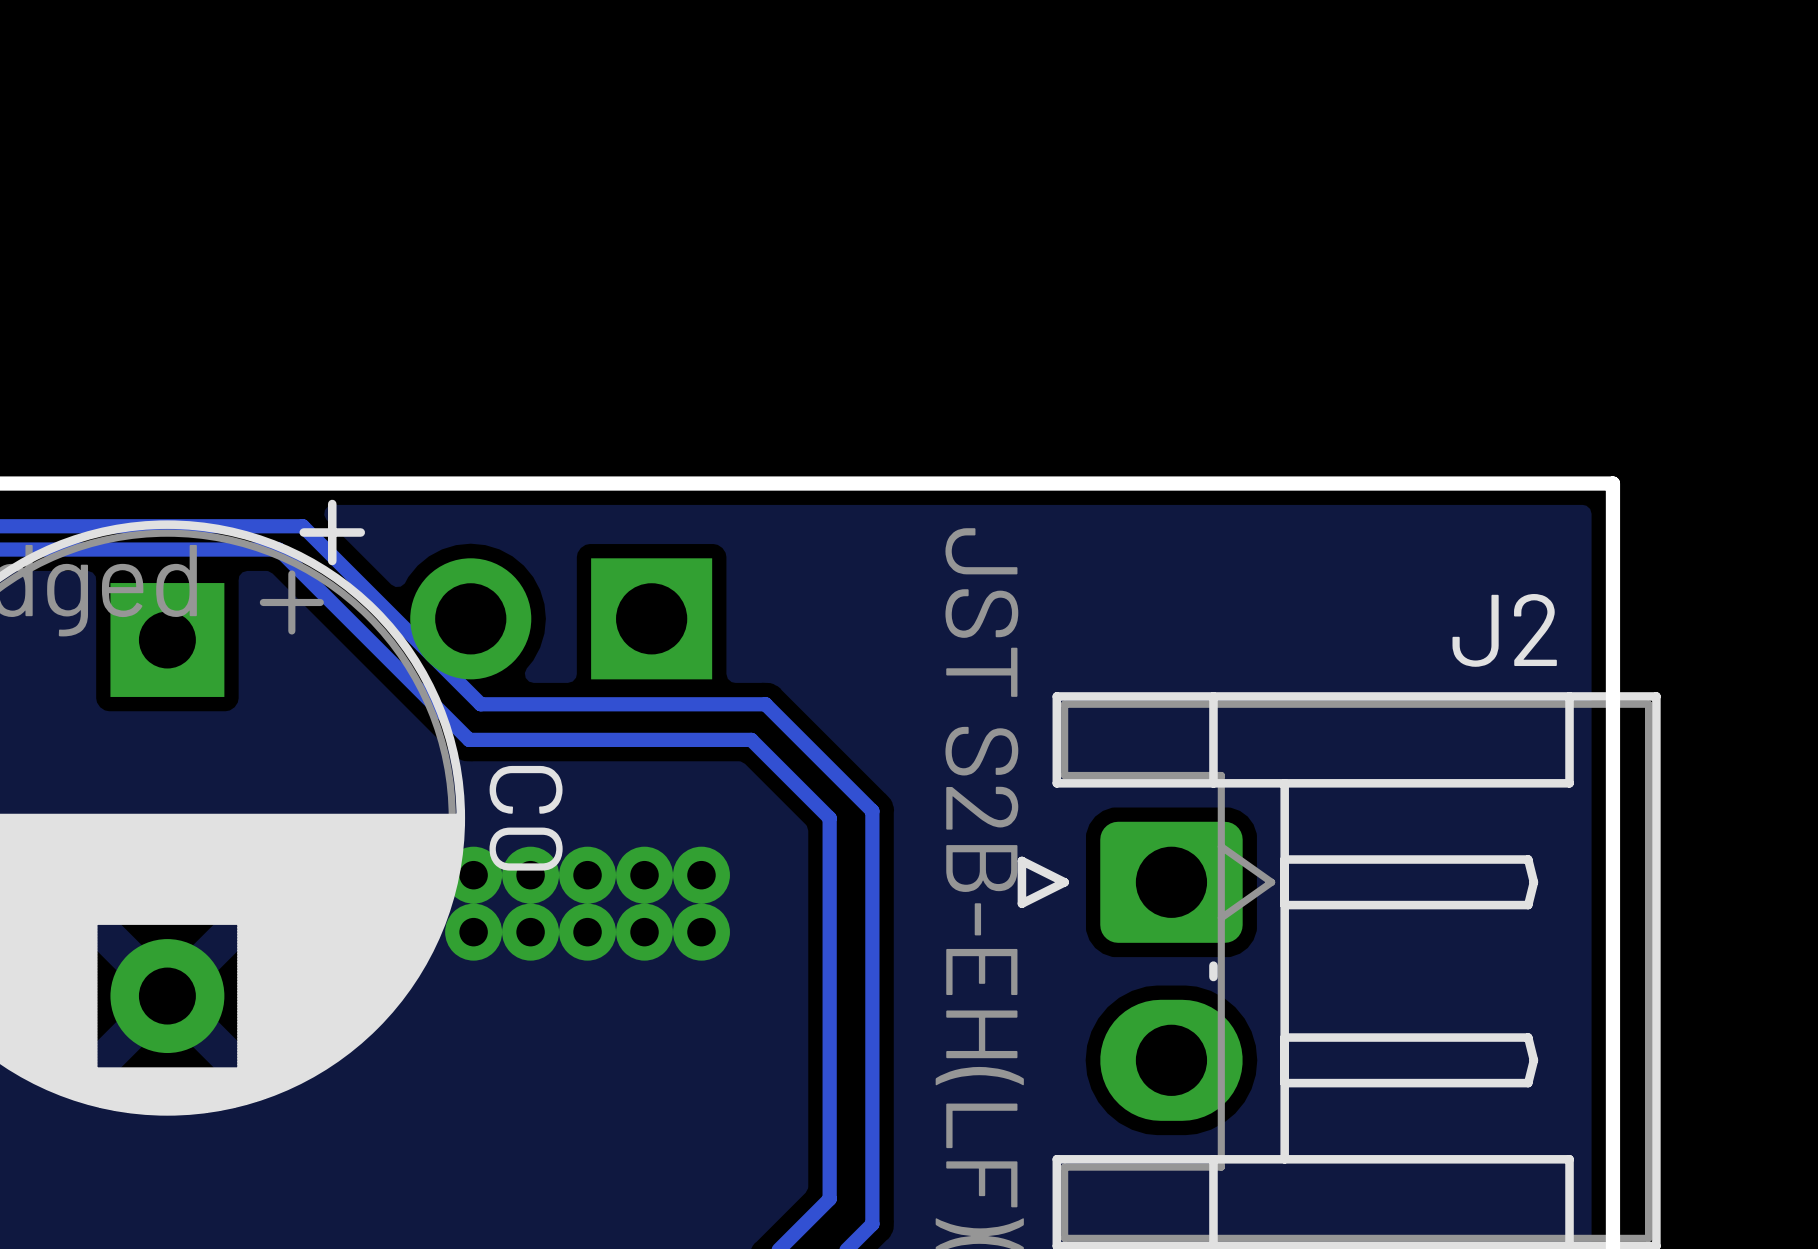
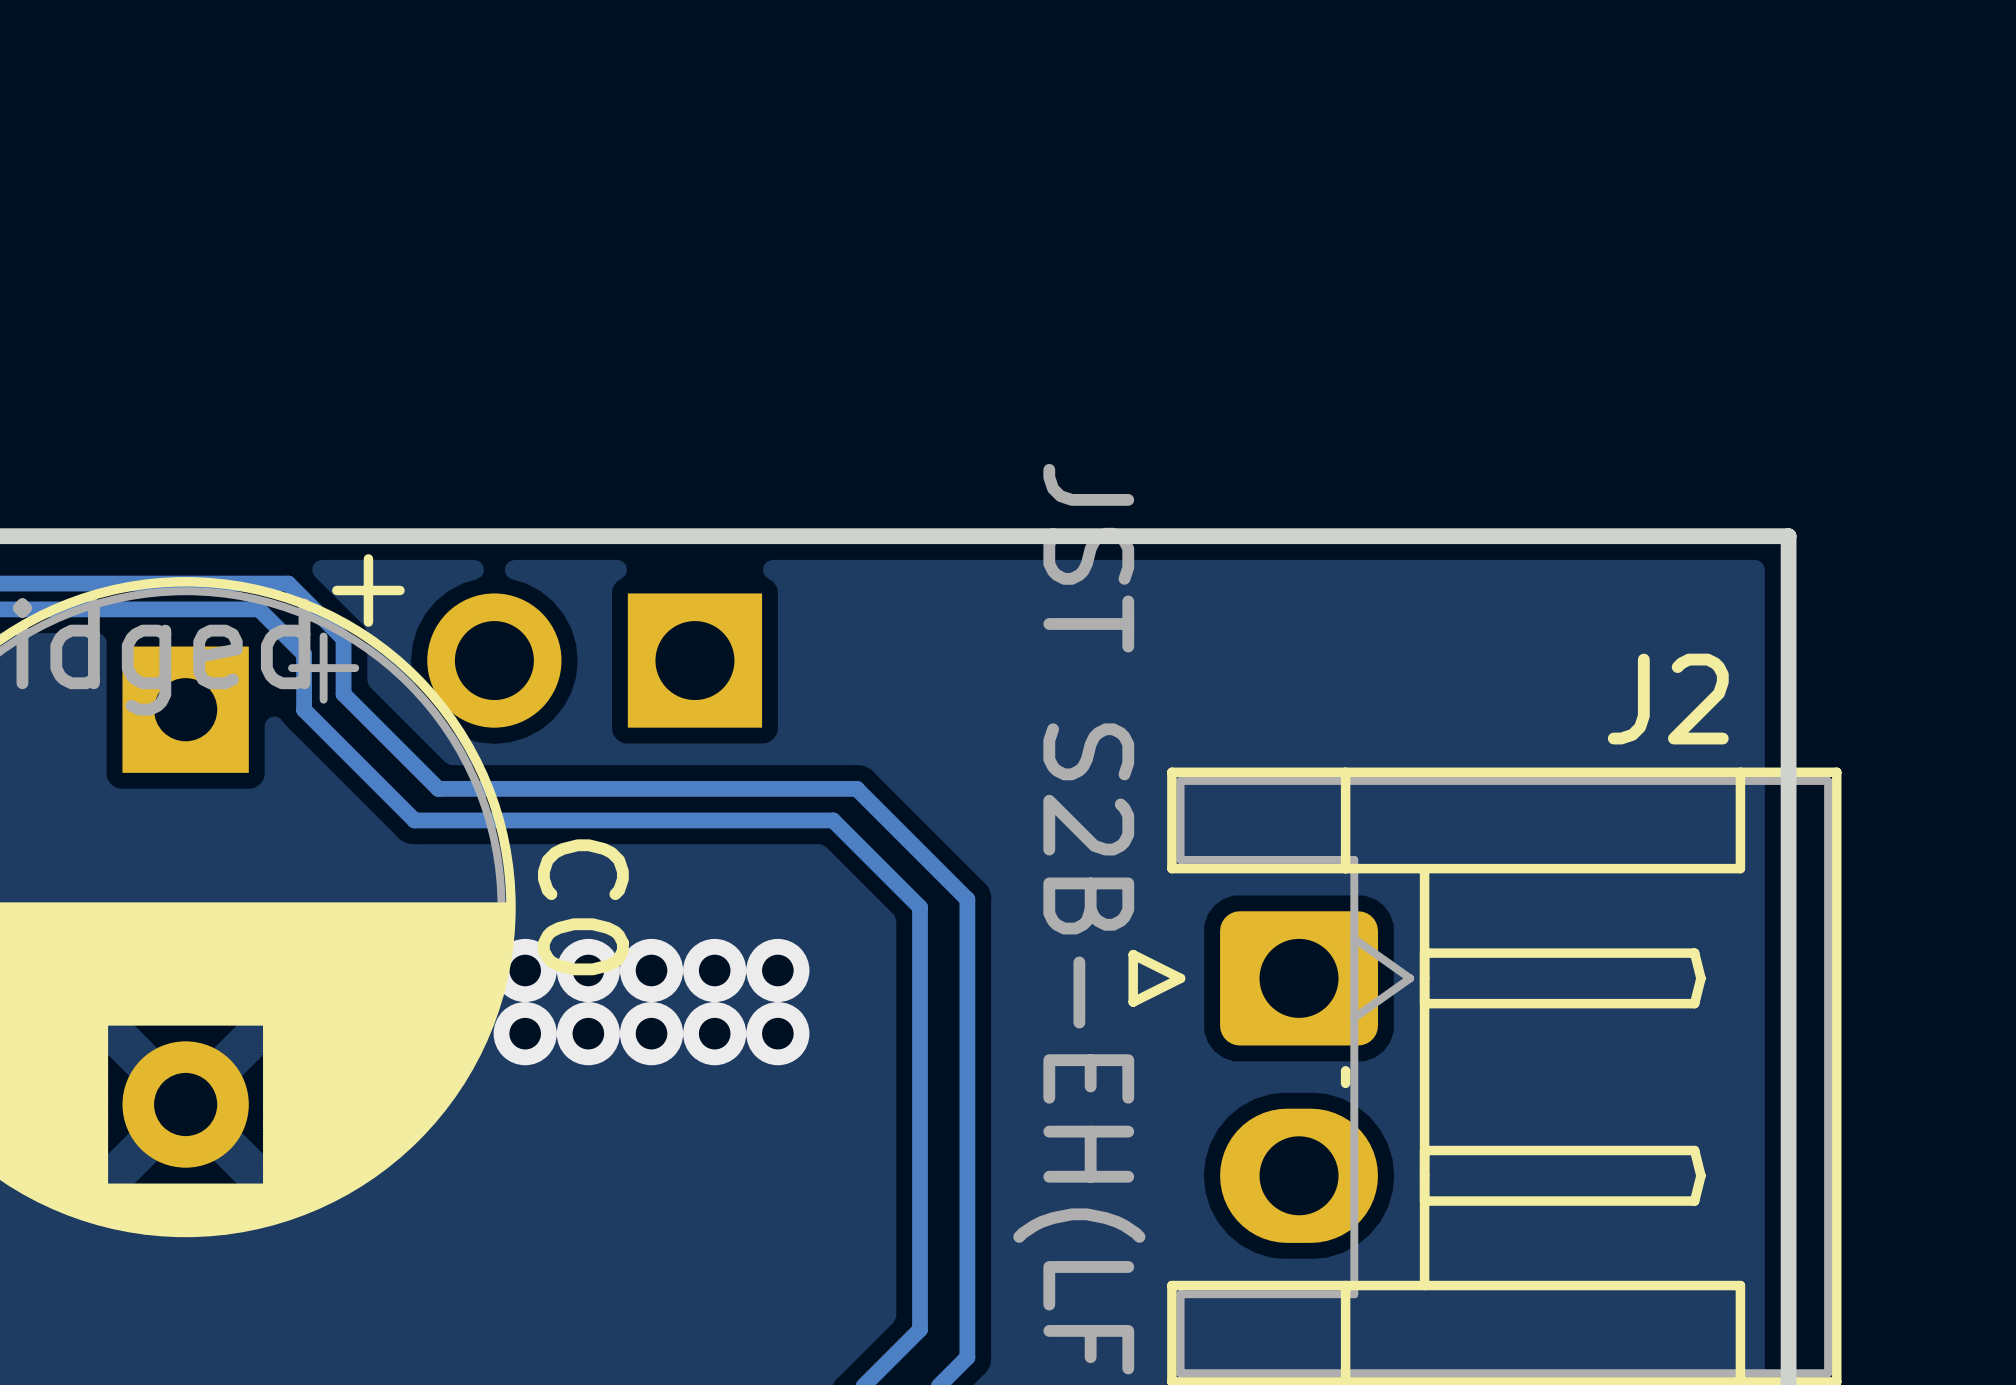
track: (259, 526) (302, 526) (480, 704) (765, 704) (772, 711) -> (288, 583) (343, 638) (343, 694) (438, 788) (856, 788)
track: (233, 549) (278, 549) (469, 739) -> (259, 609) (304, 654) (304, 709) (414, 820) (520, 820)
part position: (561, 618) -> (594, 660)

